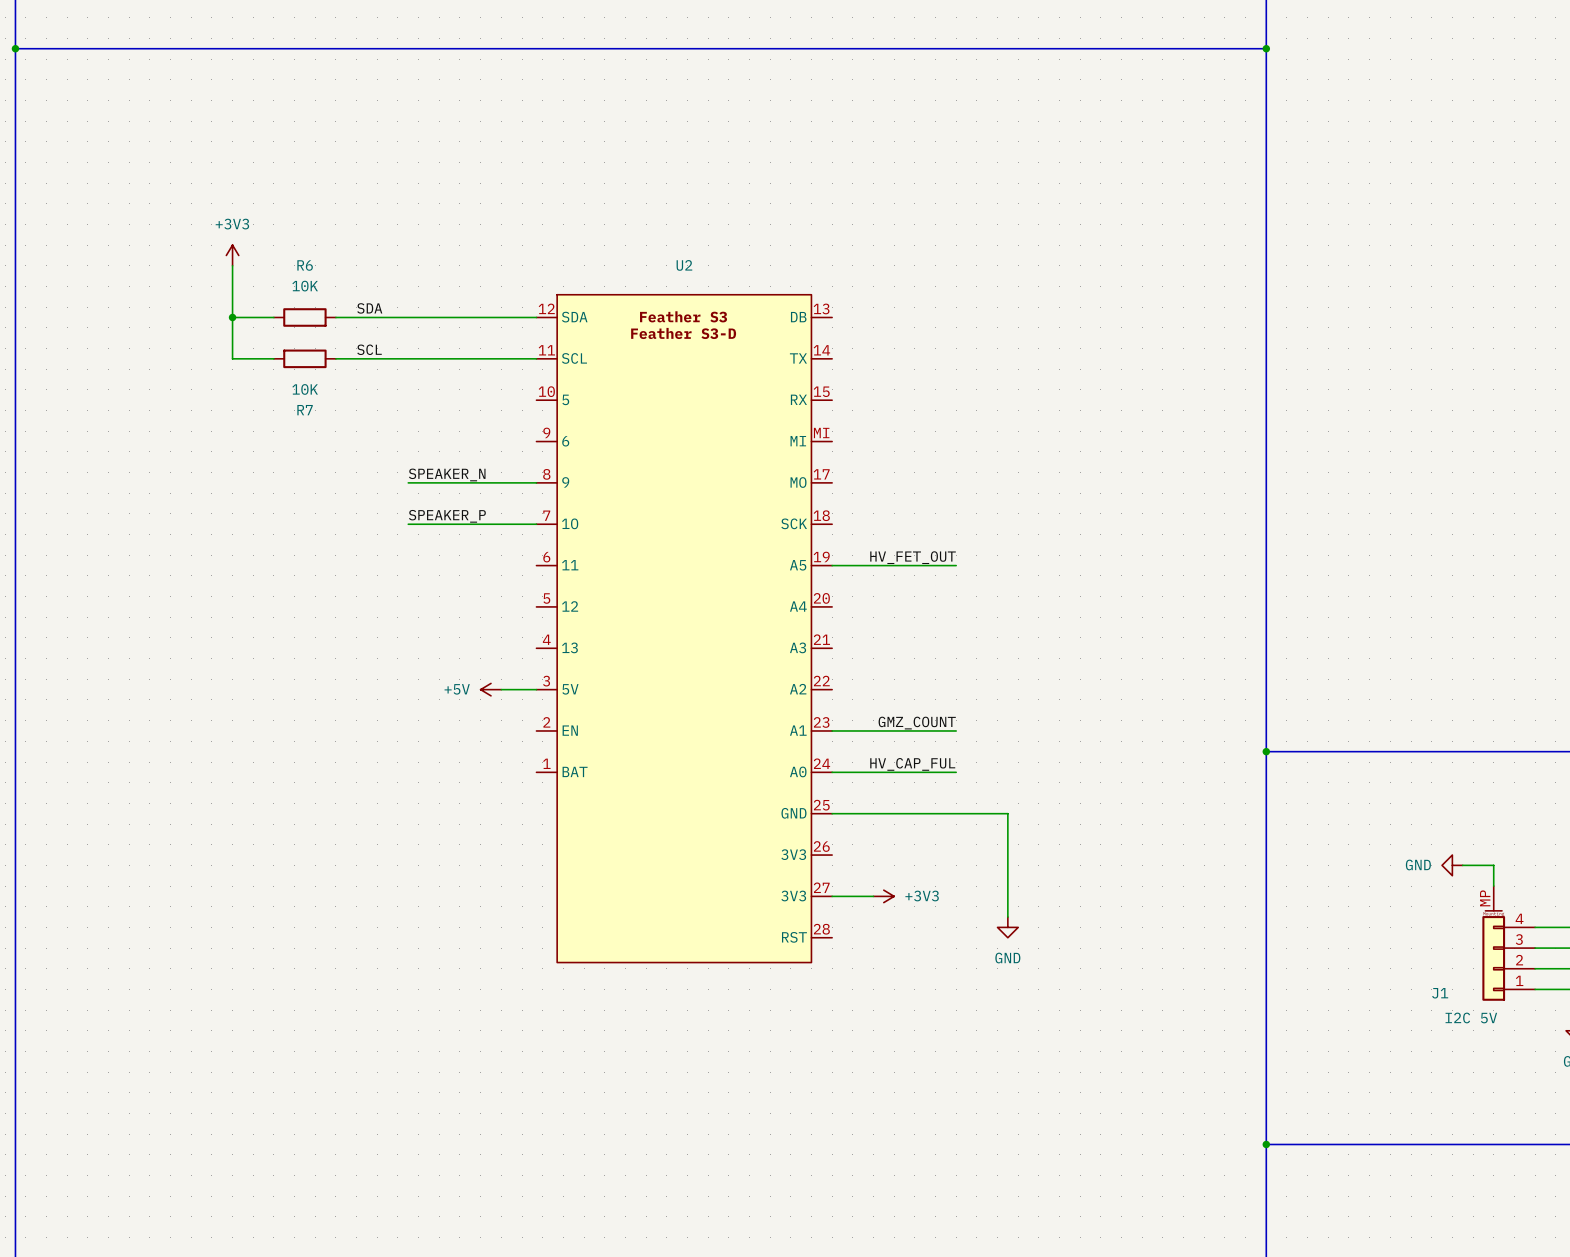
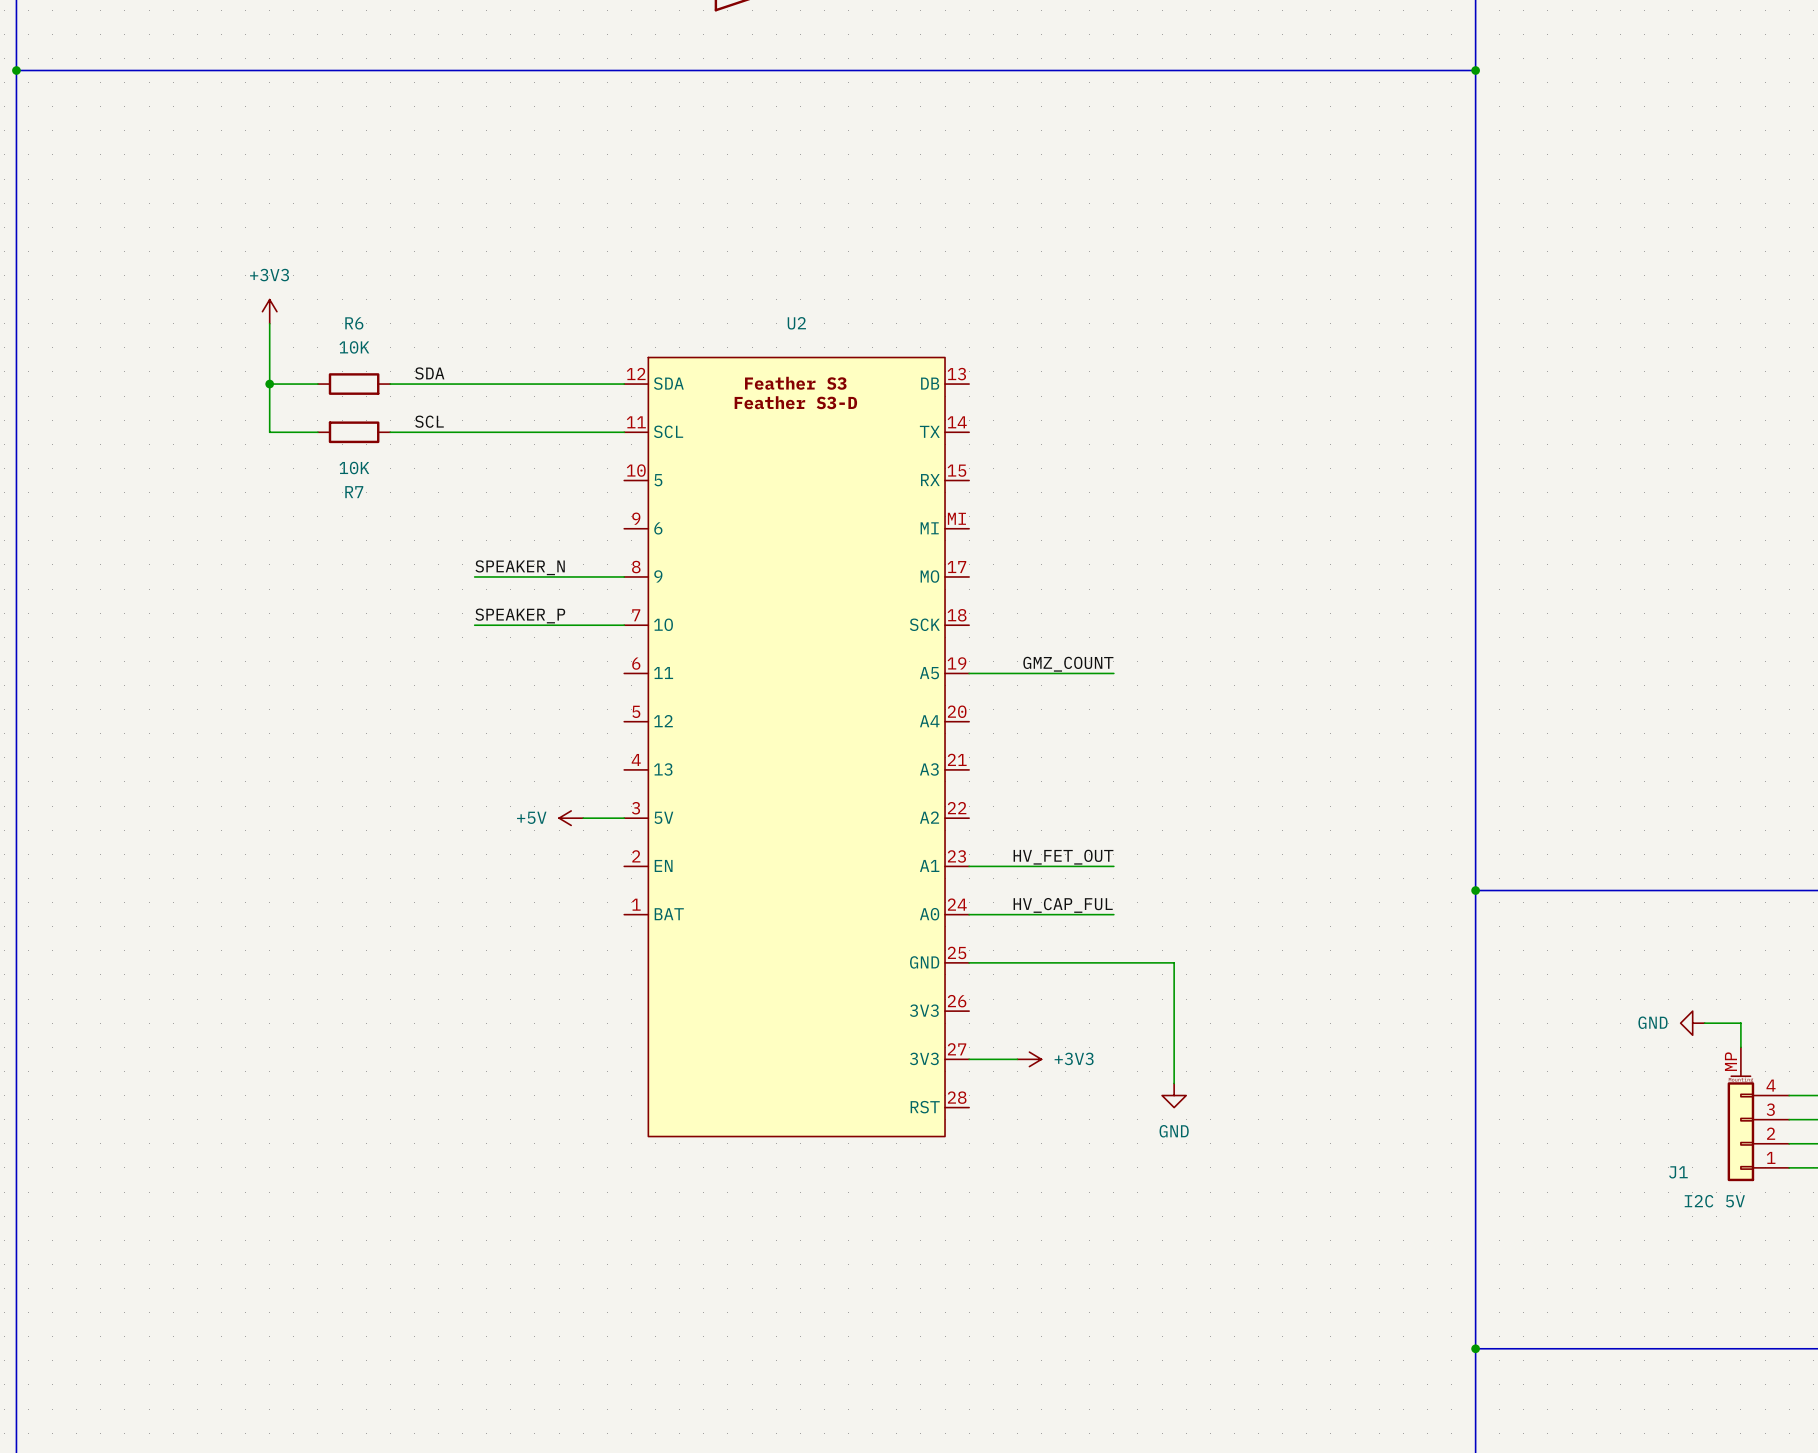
label: HV_FET_OUT (913, 557) -> GMZ_COUNT (1068, 664)
label: GMZ_COUNT (917, 723) -> HV_FET_OUT (1063, 857)

